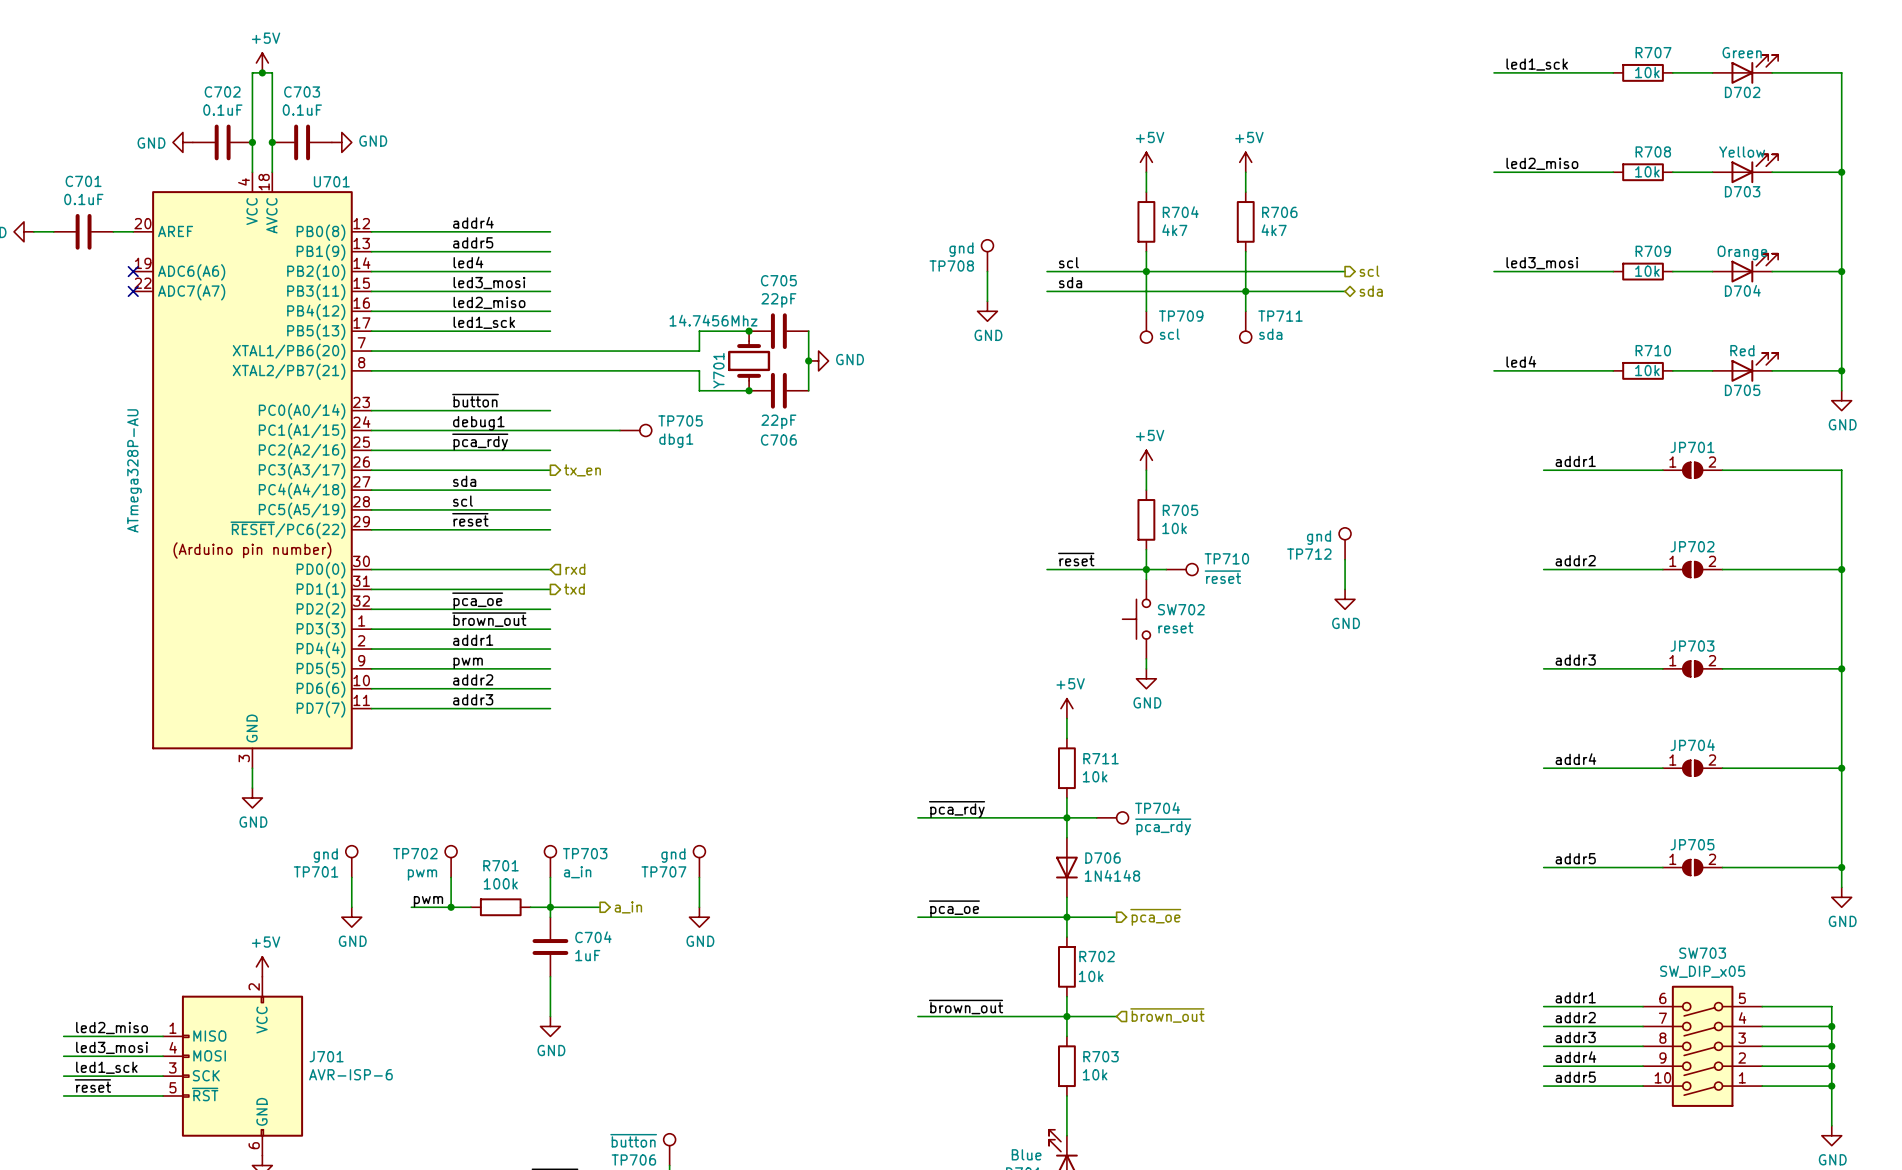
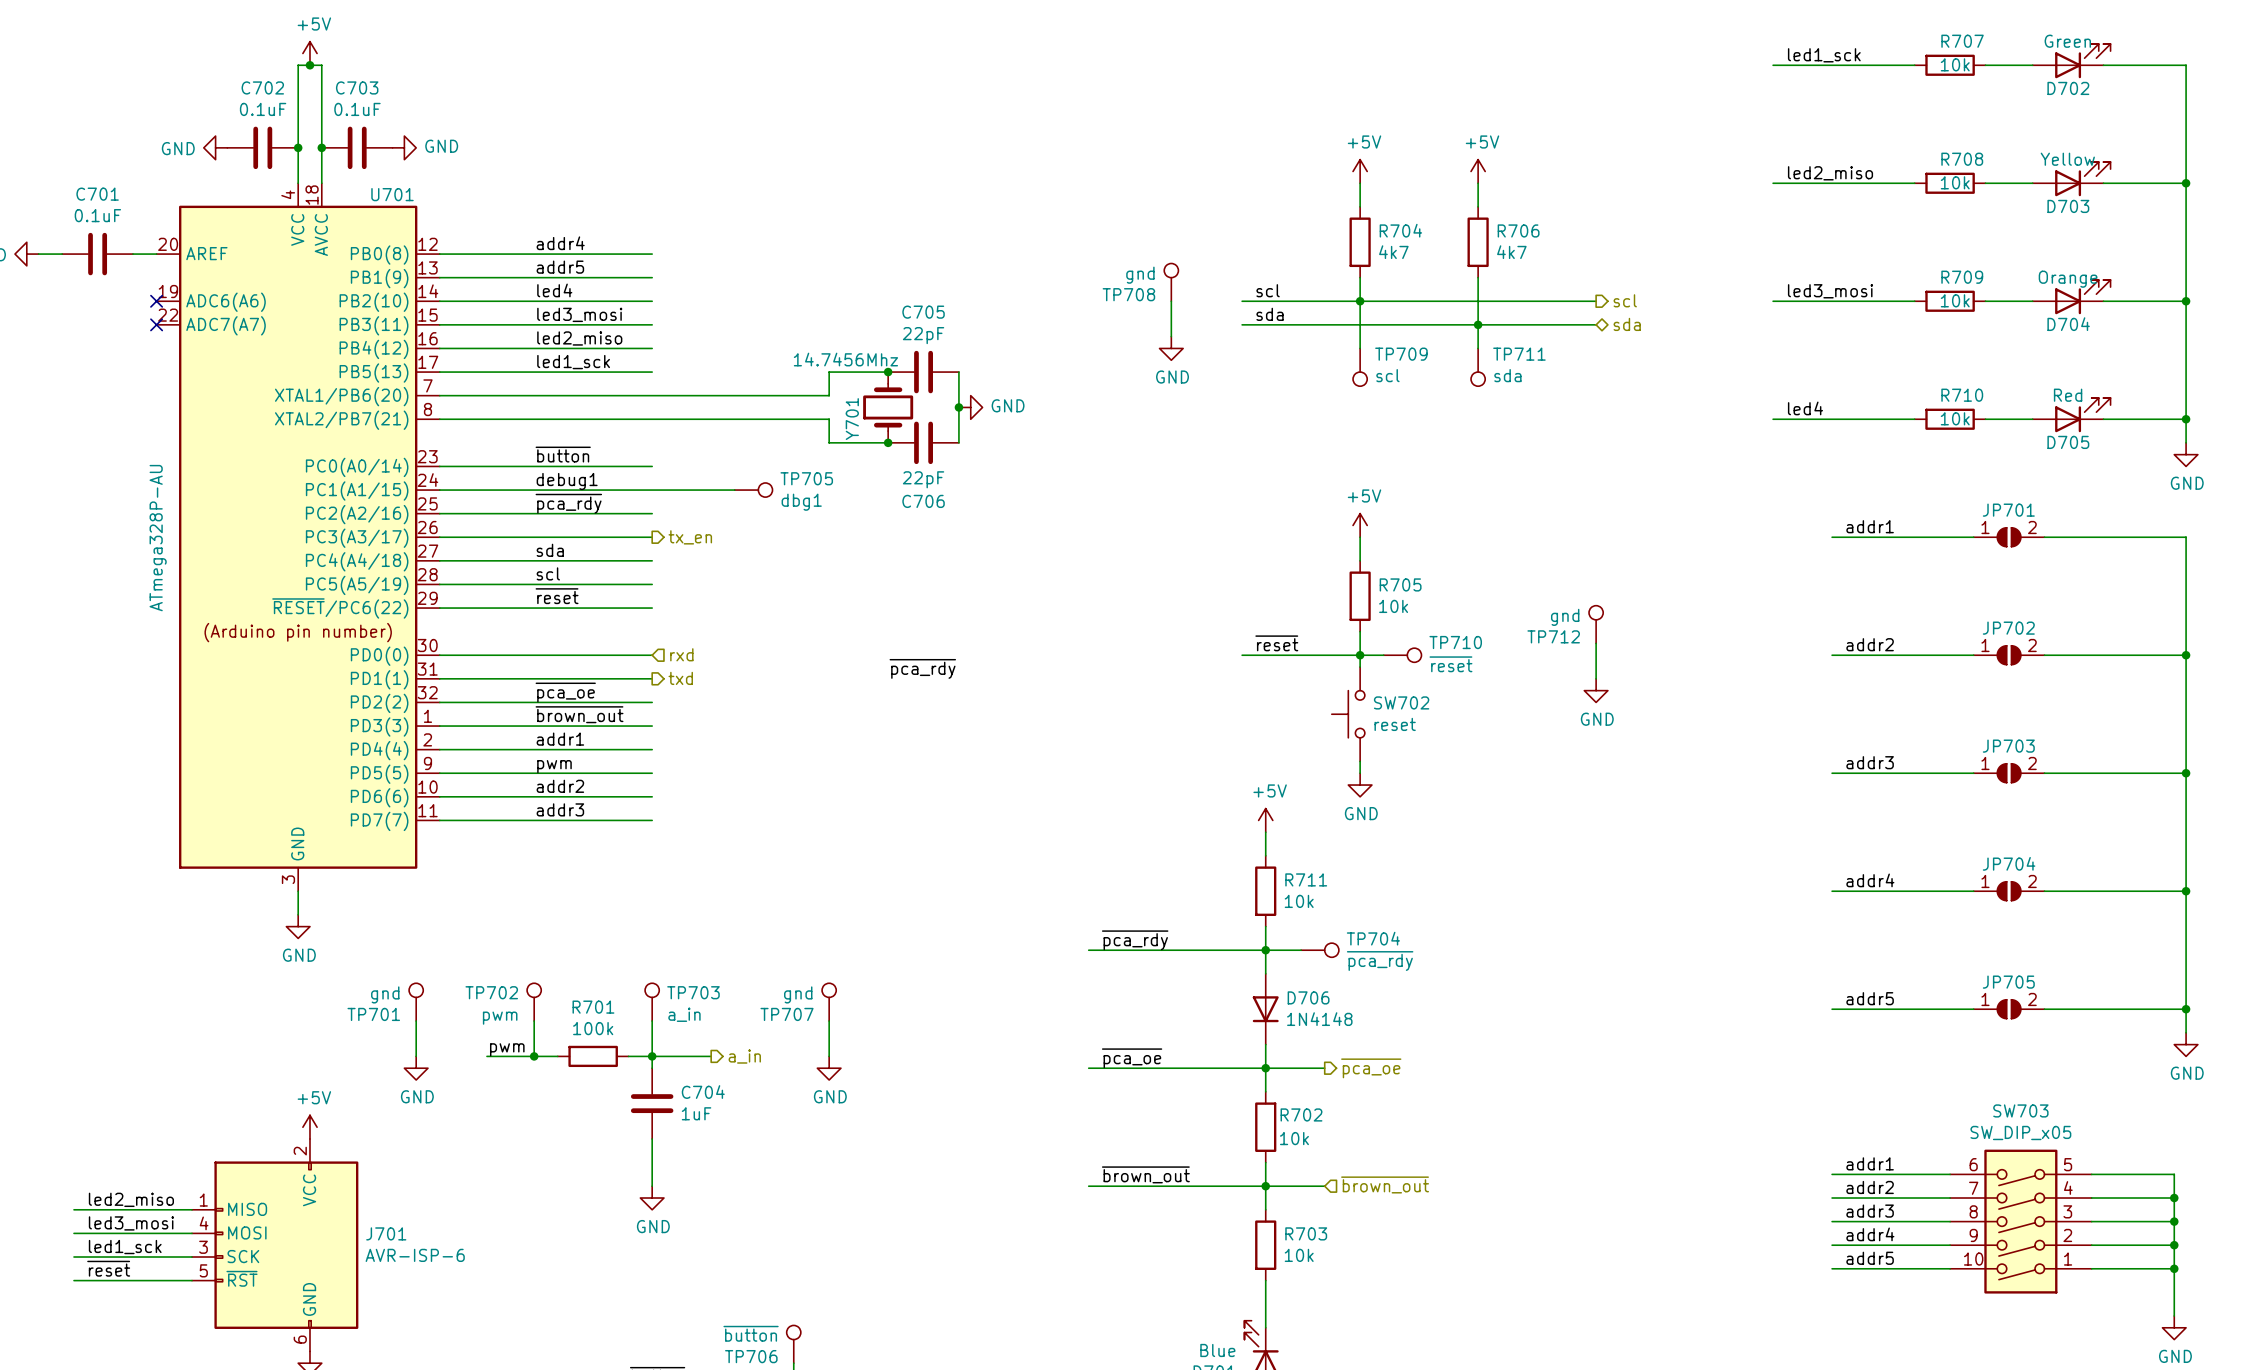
label: none -> ~{pca_rdy} (922, 668)

